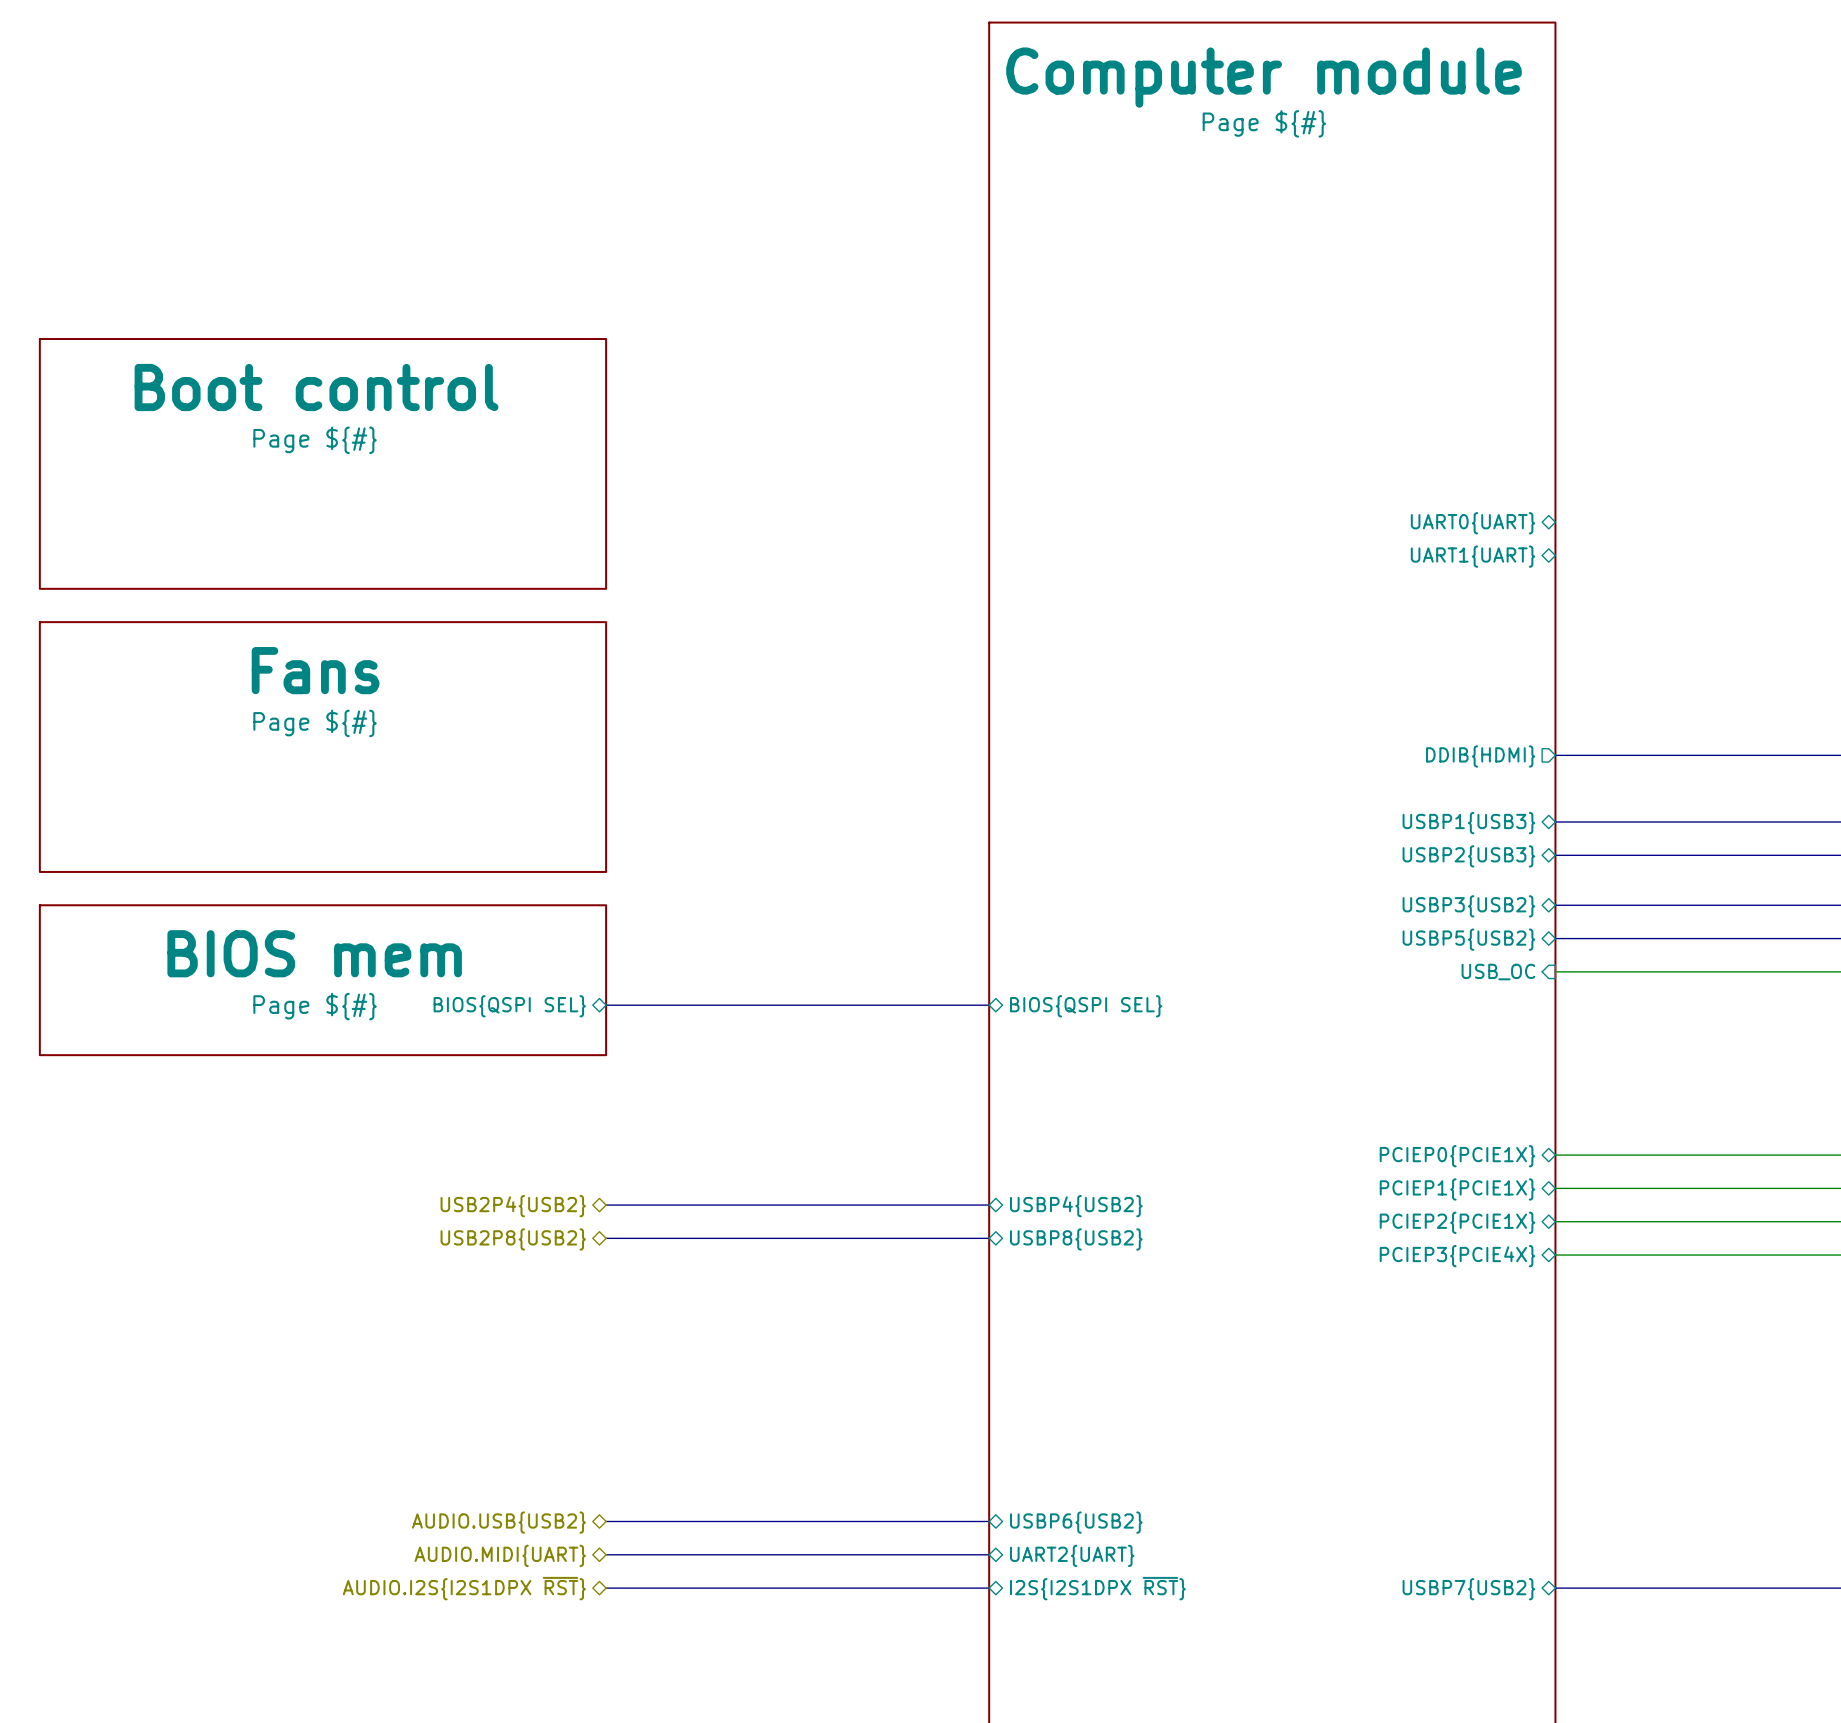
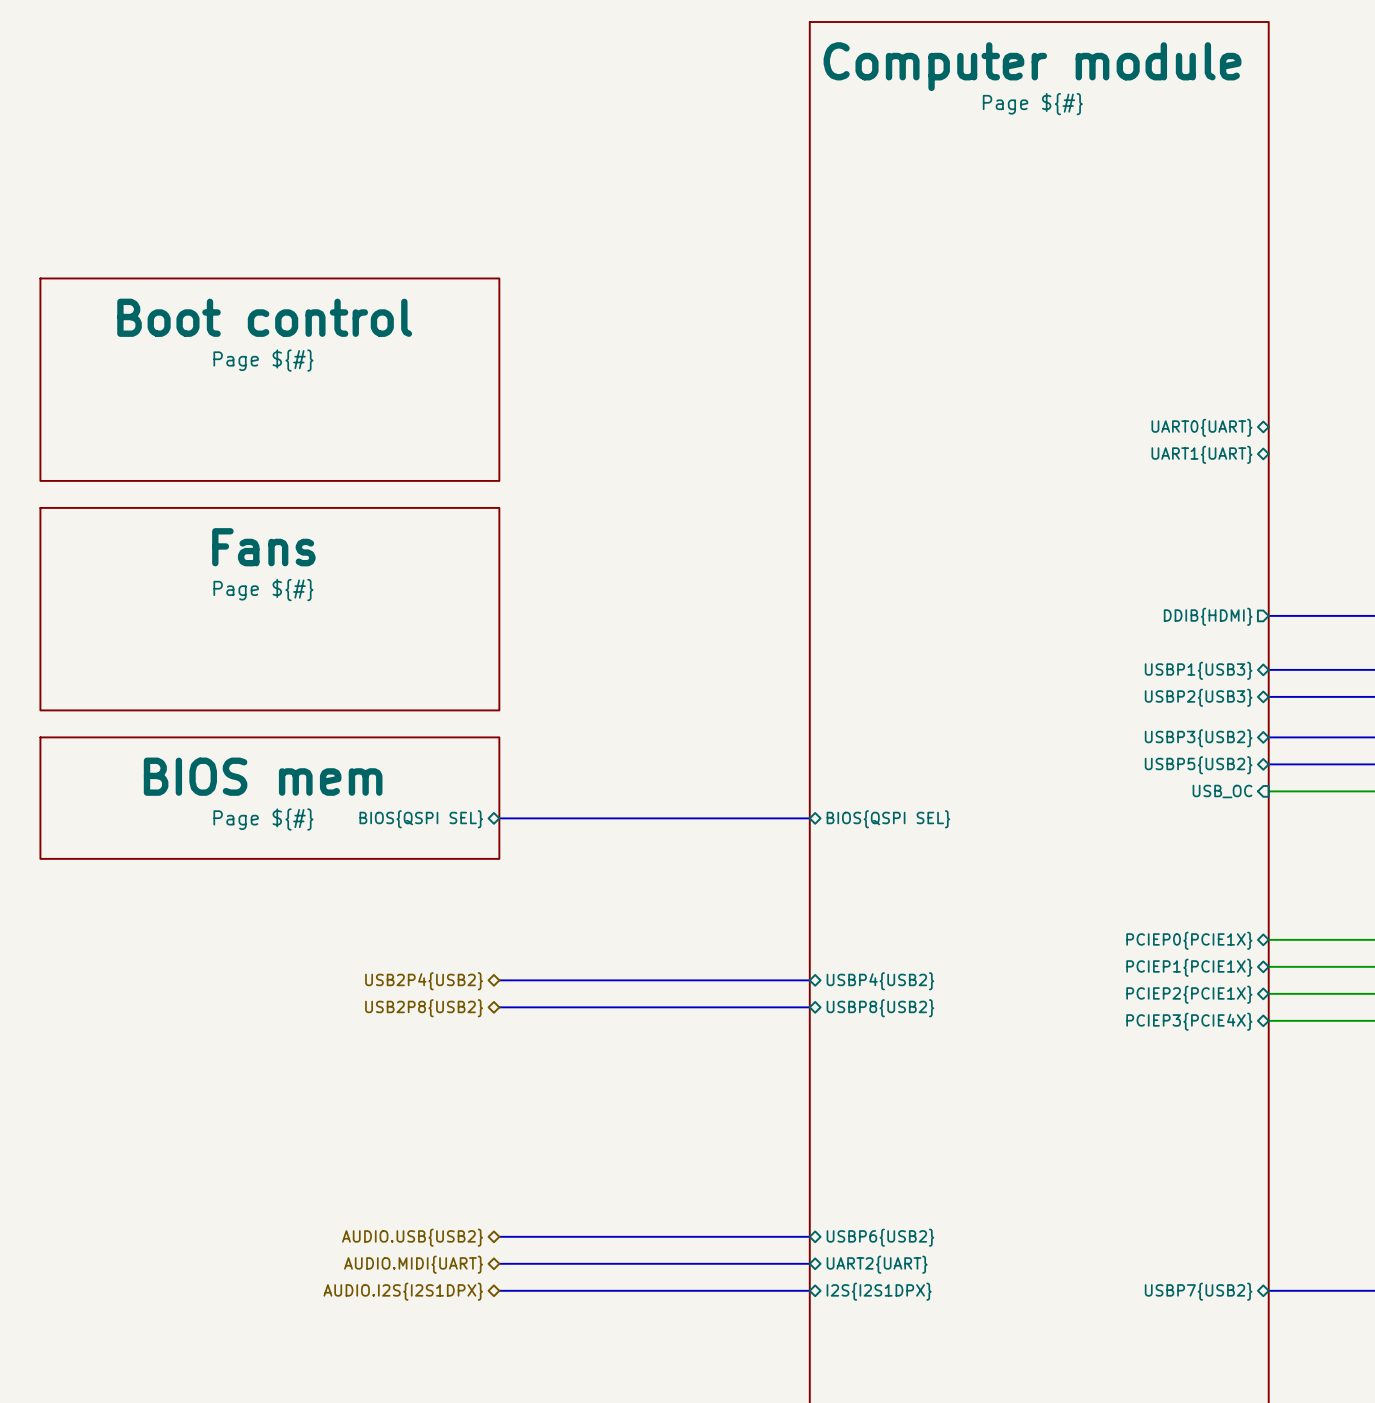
hierarchical label: AUDIO.I2S{I2S1DPX ~{RST}} (464, 1588) -> AUDIO.I2S{I2S1DPX} (403, 1291)
sheet pin: I2S{I2S1DPX ~{RST}} (1097, 1588) -> I2S{I2S1DPX} (879, 1291)

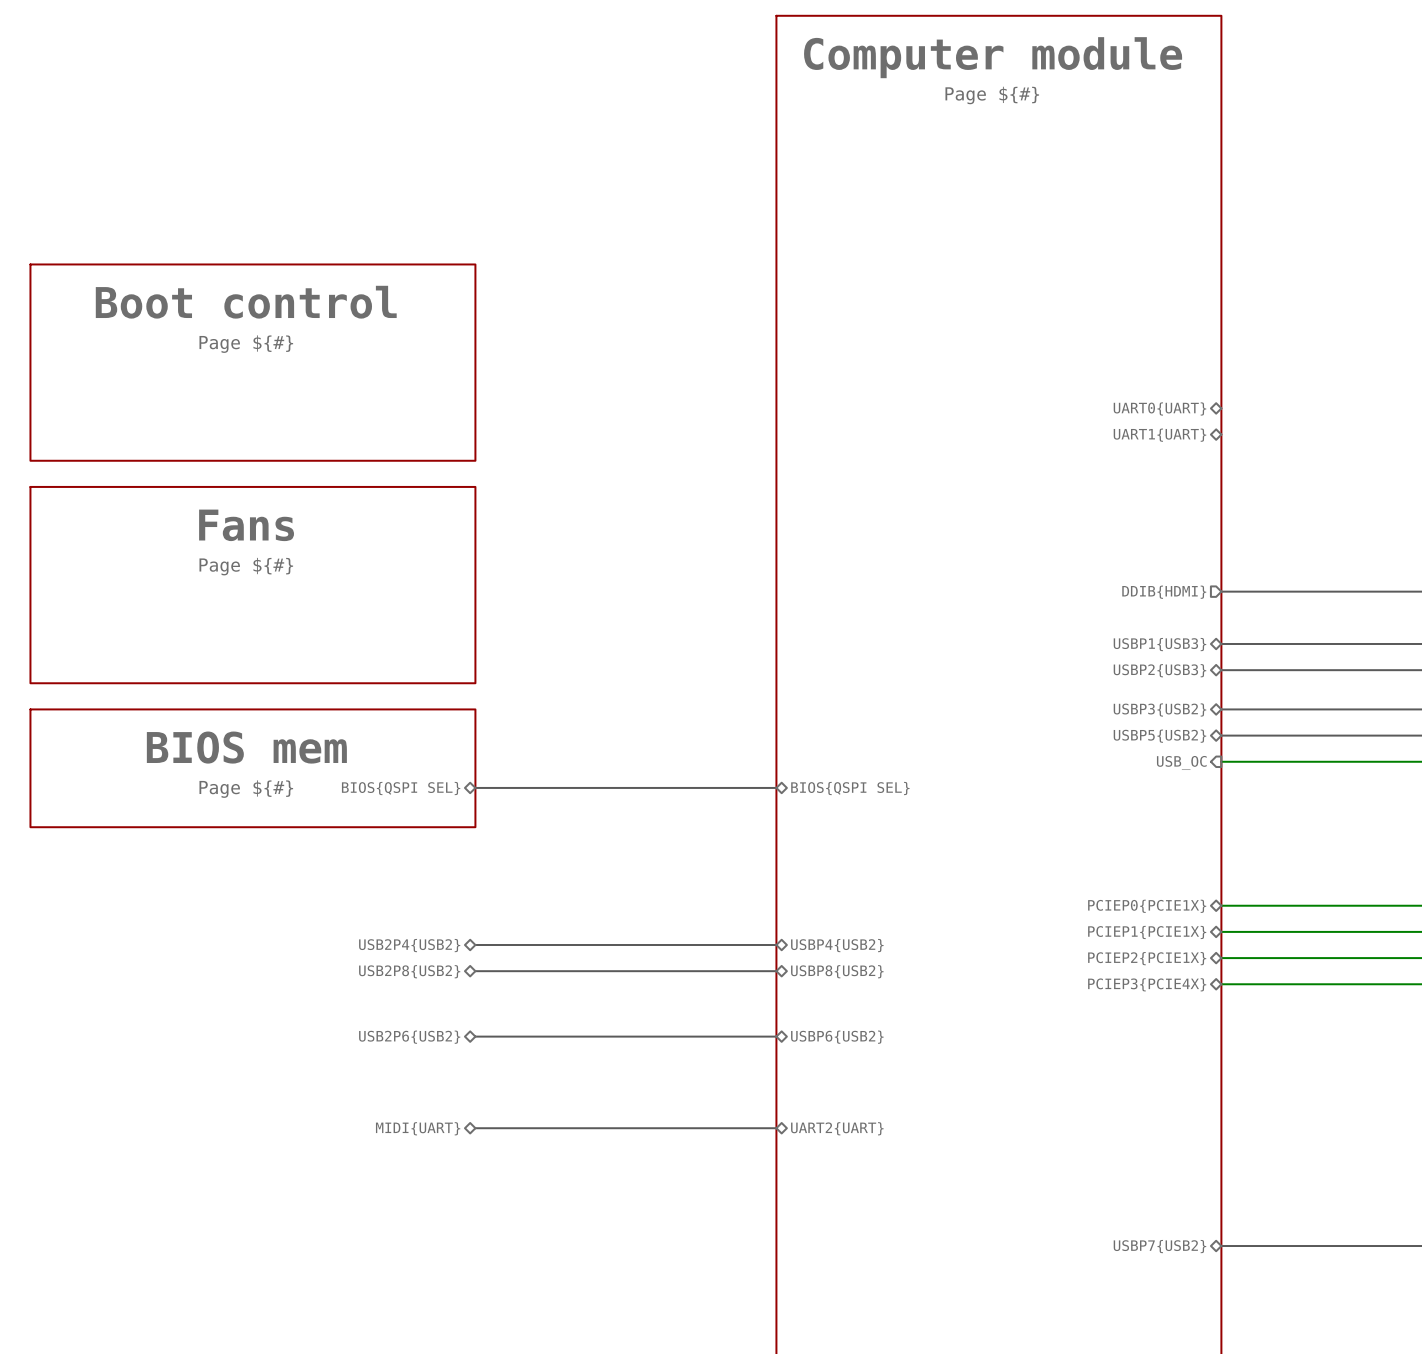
hierarchical label: none -> USB2P6{USB2} (409, 1037)
hierarchical label: none -> MIDI{UART} (418, 1128)
bus: (499, 1236) (809, 1236) -> (475, 1128) (776, 1128)
hierarchical label: AUDIO.USB{USB2} (412, 1237) -> none
sheet pin position: USBP6{USB2} (880, 1237) -> USBP6{USB2} (837, 1037)
bus: (499, 1263) (809, 1263) -> (475, 1036) (776, 1036)
hierarchical label: AUDIO.MIDI{UART} (413, 1264) -> none
sheet pin position: UART2{UART} (877, 1264) -> UART2{UART} (837, 1128)
bus: (499, 1290) (809, 1290) -> none
hierarchical label: AUDIO.I2S{I2S1DPX} (403, 1291) -> none
sheet pin: I2S{I2S1DPX} (879, 1291) -> none

